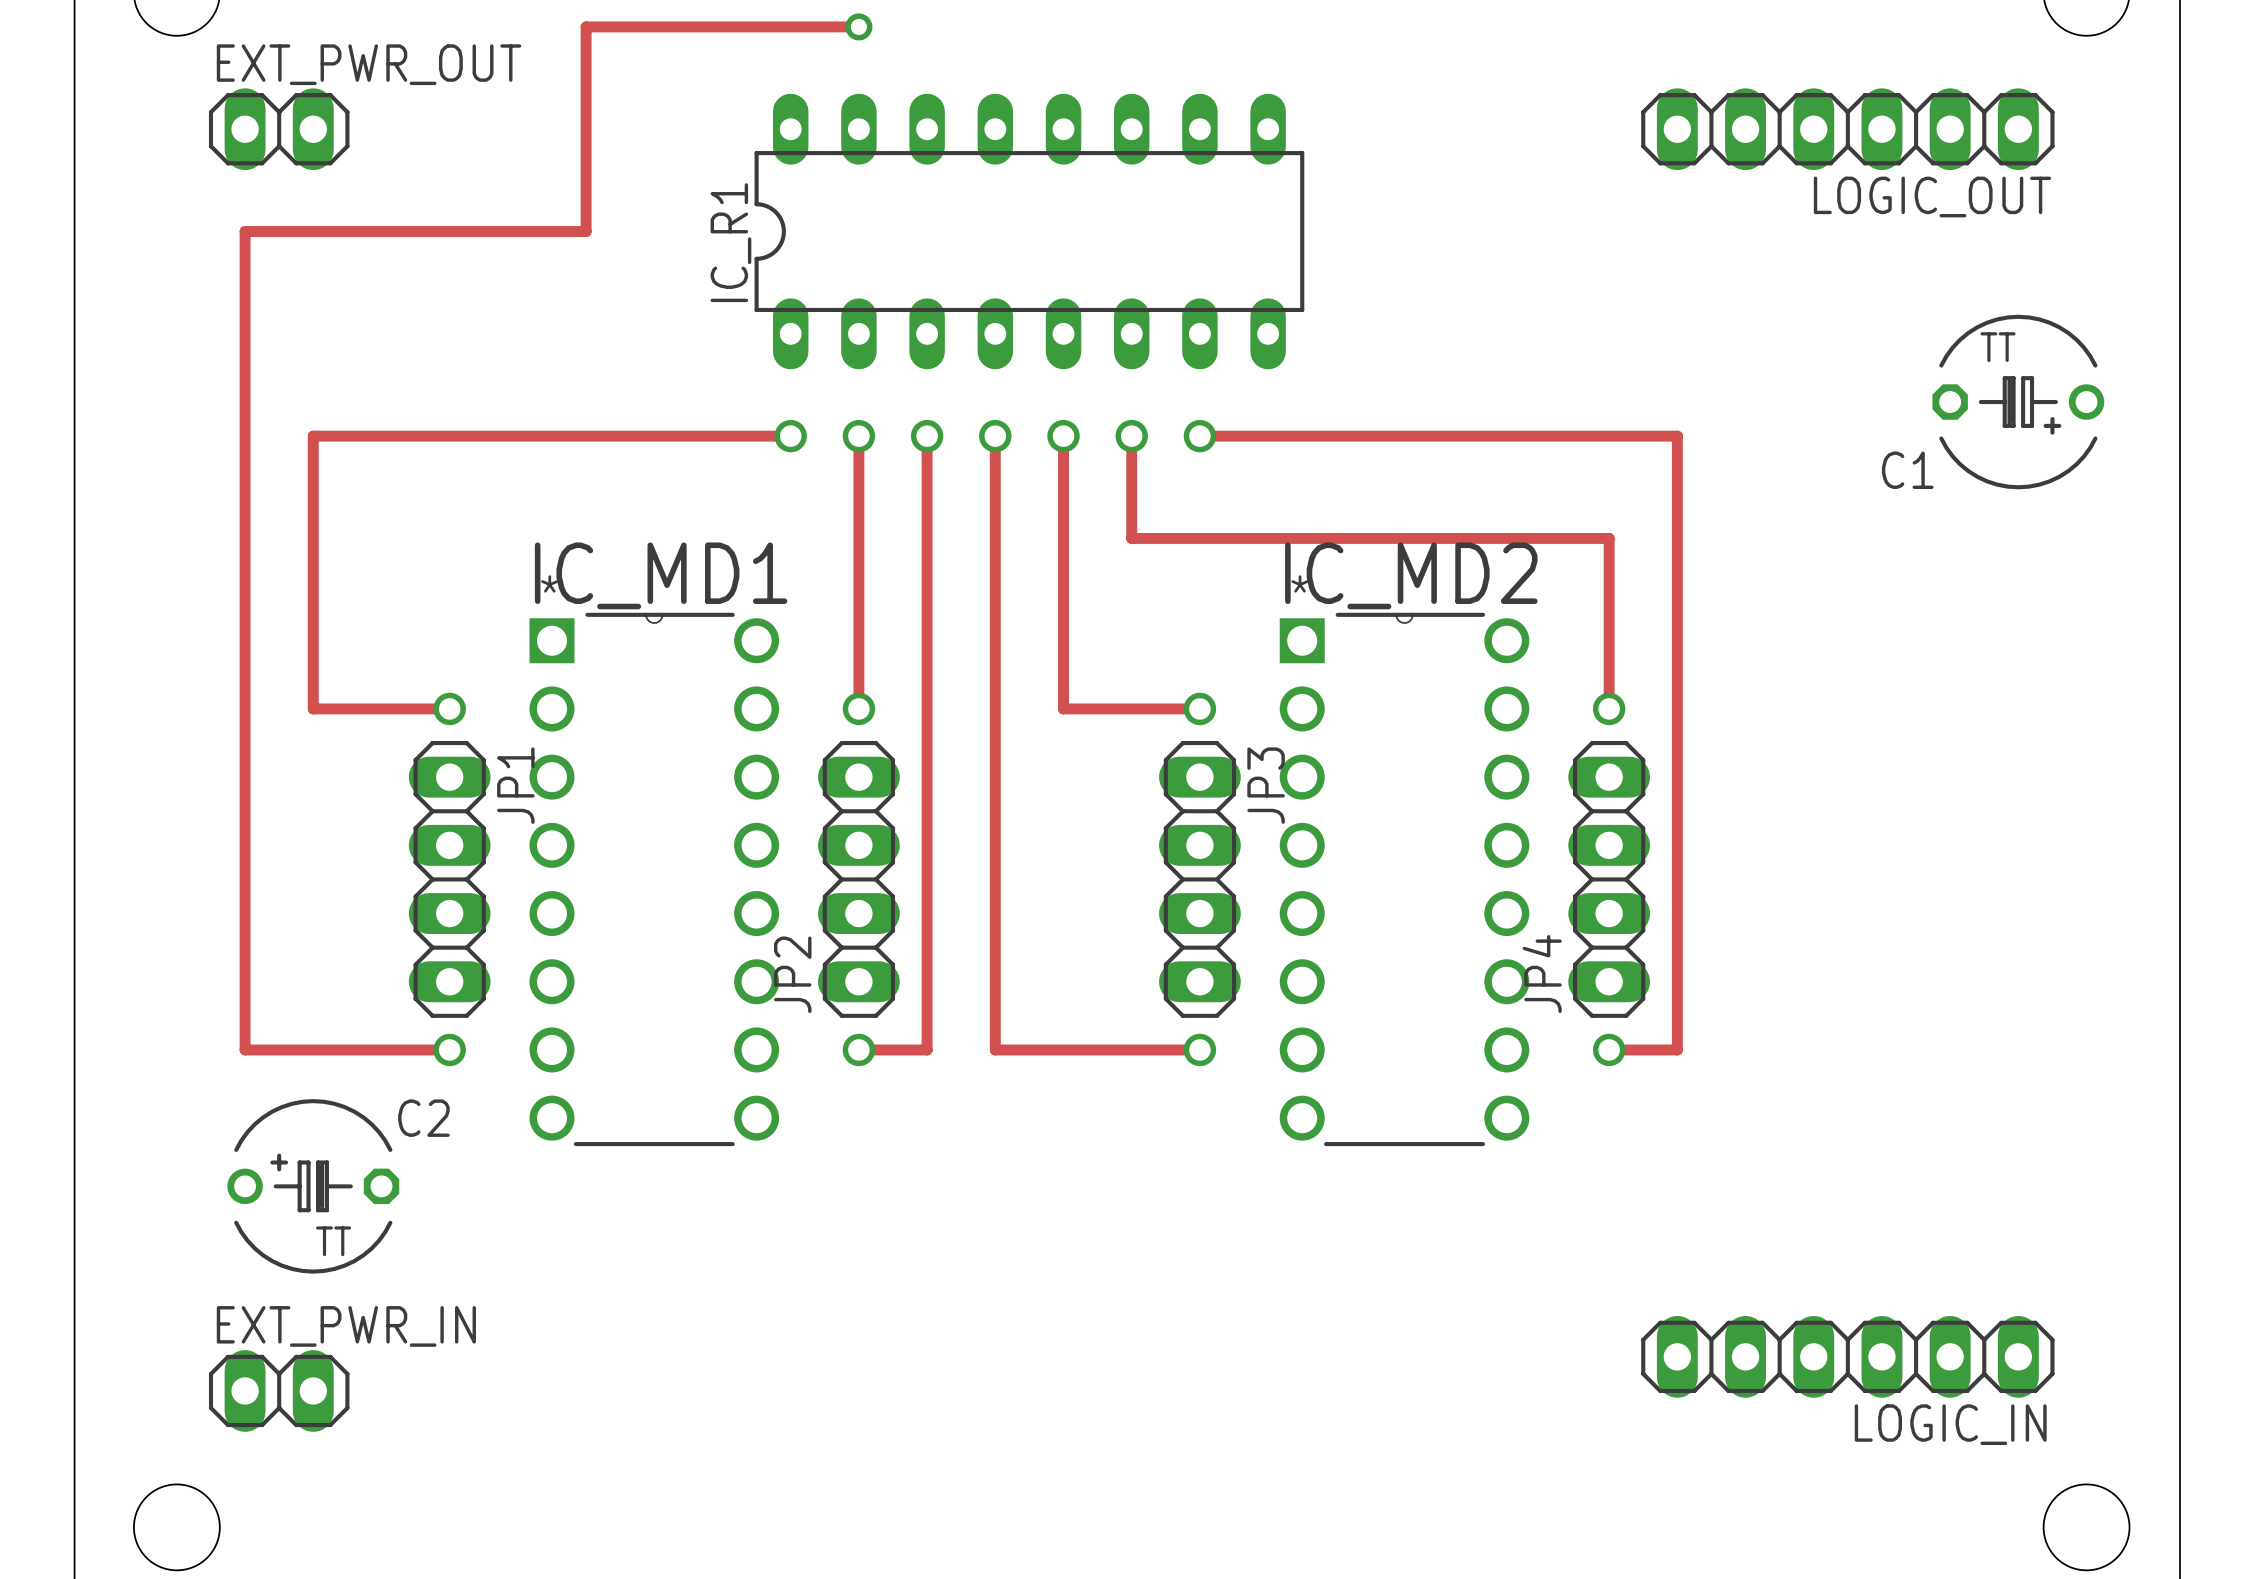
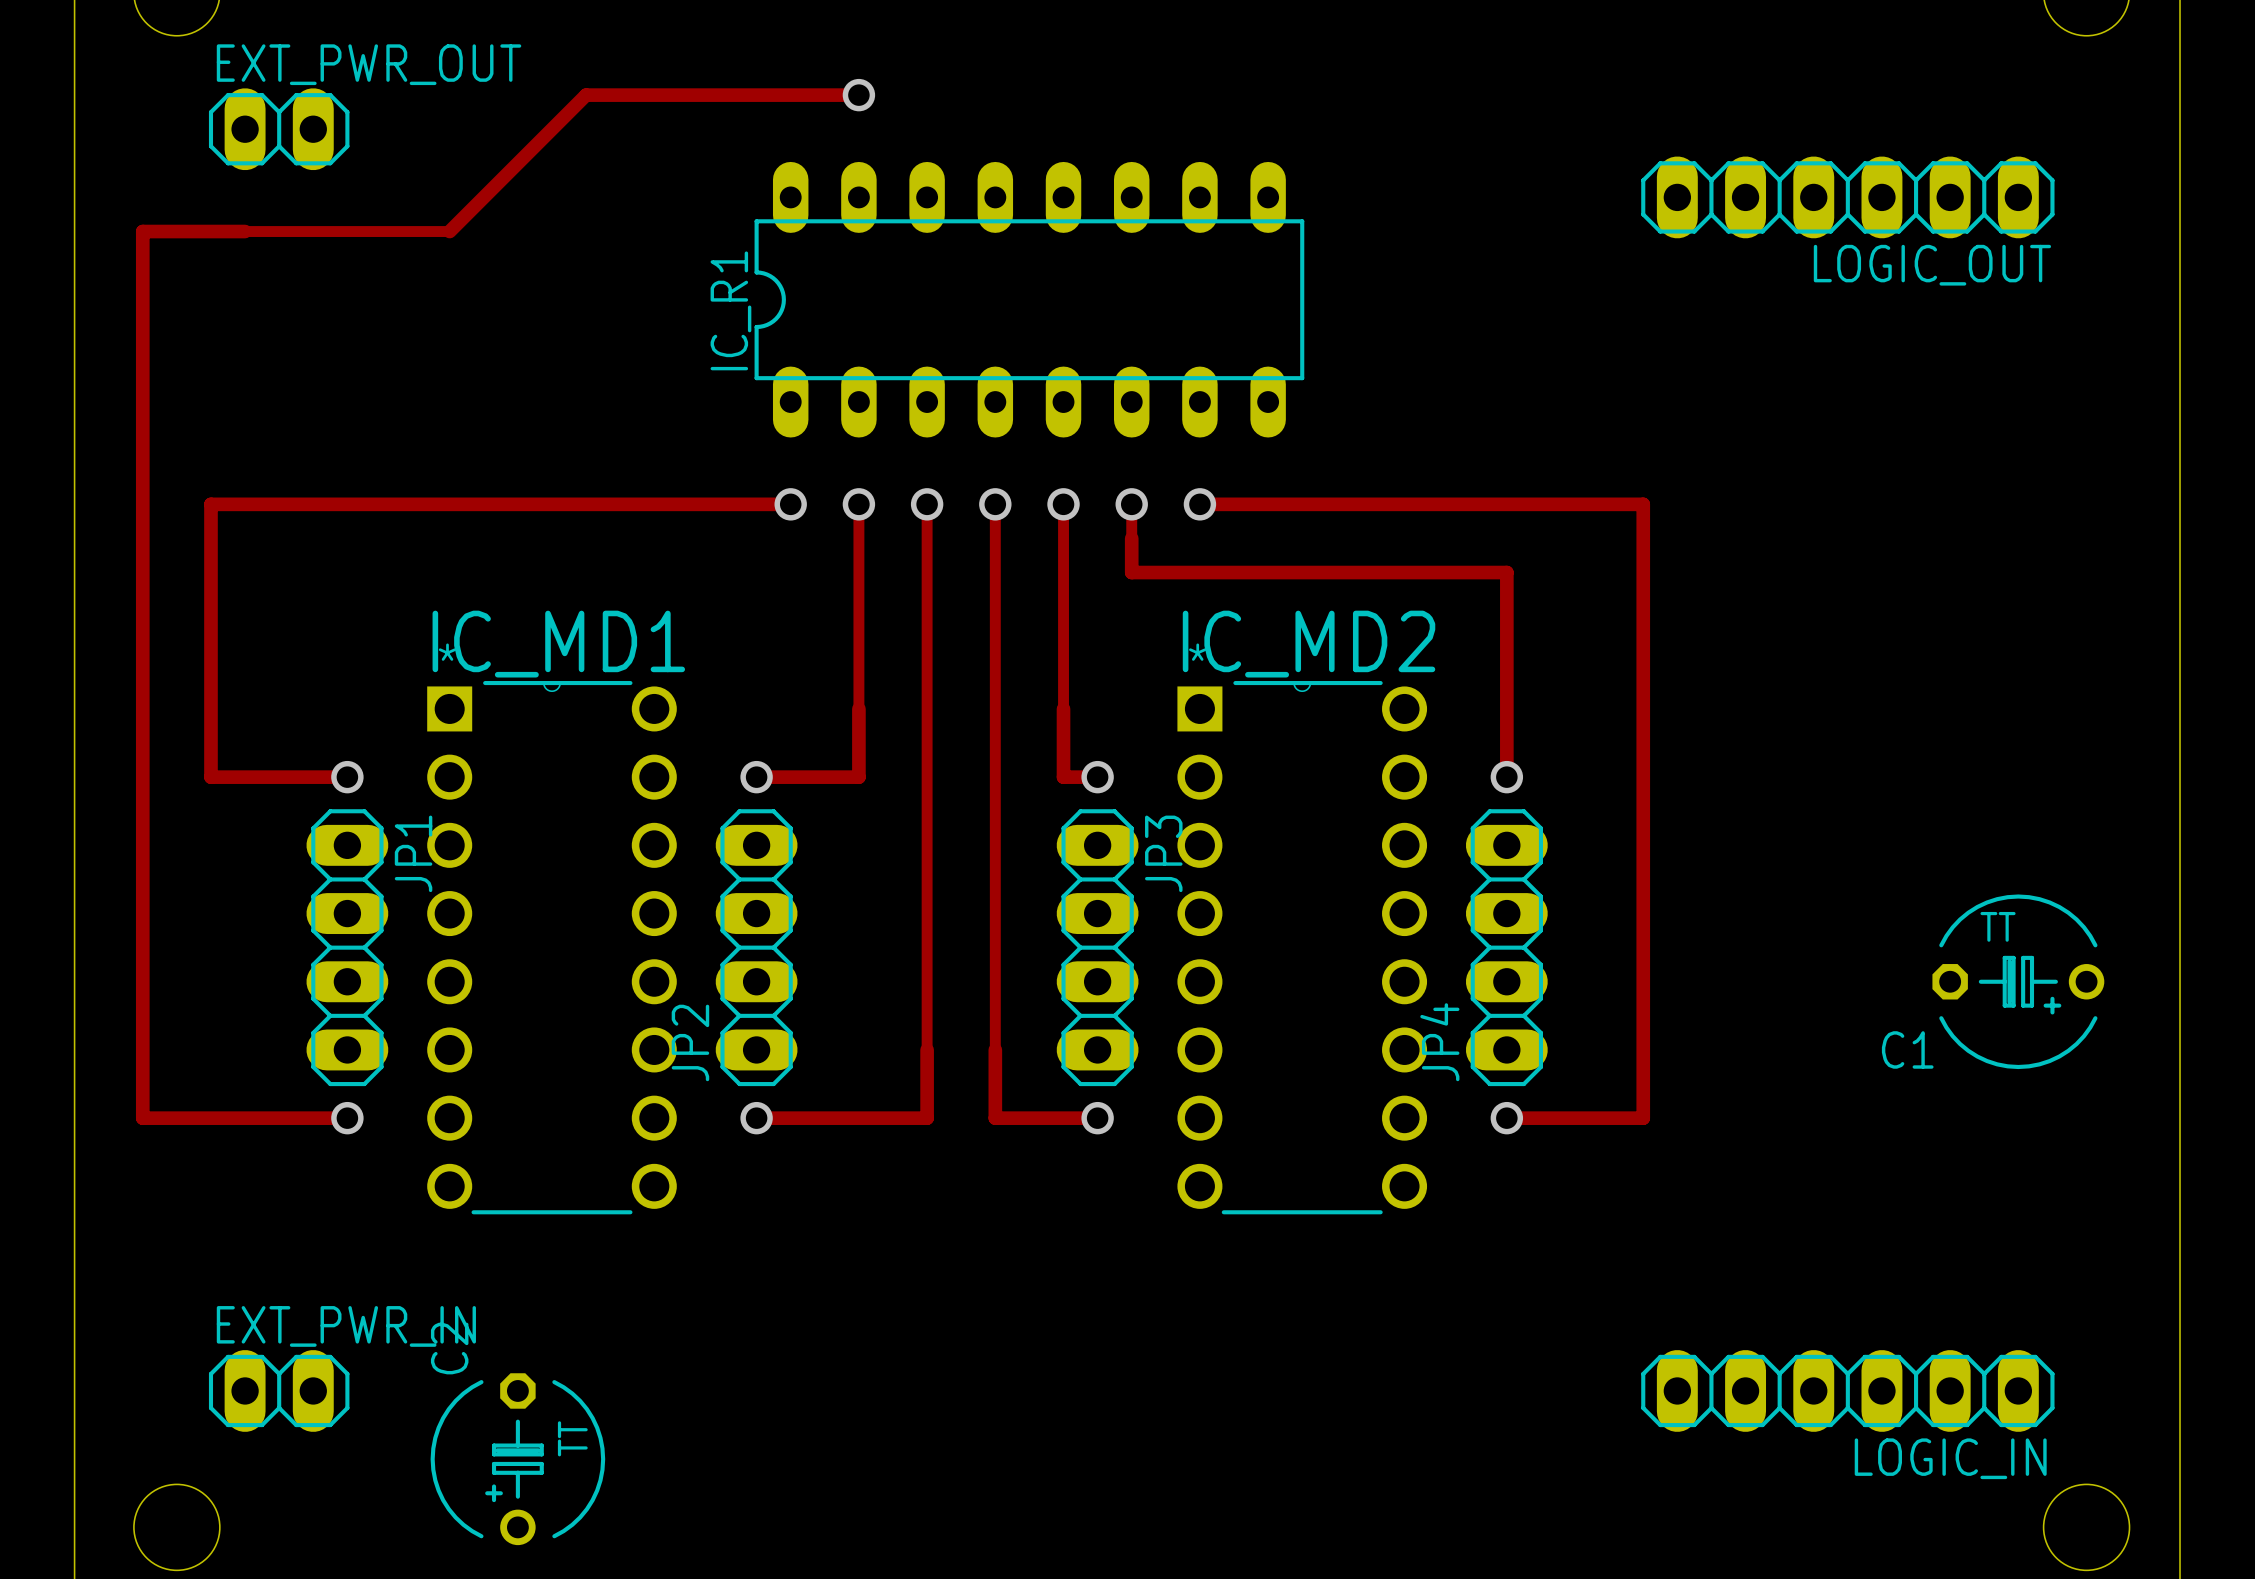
track: (858, 26) (586, 26) (586, 231) (449, 231) -> (858, 95) (586, 95) (449, 231)
via: (858, 26) -> none
via: none -> (858, 95)
LOGIC_OUT position: (1847, 129) -> (1847, 197)
track: (245, 231) (245, 1049) (449, 1049) -> (245, 231) (142, 231) (142, 1118) (347, 1118)
IC_R1 position: (1029, 231) -> (1029, 299)
C1 position: (2018, 402) -> (2018, 981)
track: (790, 436) (313, 436) (313, 708) (449, 708) -> none
via: (790, 436) -> none
track: (858, 436) (858, 504) -> none
via: (858, 436) -> none
track: (927, 436) (927, 504) -> none
via: (927, 436) -> none
track: (995, 436) (995, 504) -> none
via: (995, 436) -> none
track: (1063, 436) (1063, 504) -> none
via: (1063, 436) -> none
track: (1131, 436) (1131, 504) -> none
via: (1131, 436) -> none
track: (1199, 436) (1677, 436) (1677, 1049) (1609, 1049) -> none
via: (1199, 436) -> none
track: none -> (790, 504) (210, 504) (210, 777) (347, 777)
via: none -> (790, 504)
via: none -> (858, 504)
via: none -> (927, 504)
via: none -> (995, 504)
via: none -> (1063, 504)
via: none -> (1131, 504)
track: none -> (1199, 504) (1643, 504) (1643, 1118) (1506, 1118)
via: none -> (1199, 504)
track: (1131, 538) (1609, 538) (1609, 708) -> (1131, 538) (1131, 572) (1506, 572) (1506, 777)
via position: (449, 708) -> (347, 777)
track: none -> (858, 708) (858, 777) (756, 777)
via: (858, 708) -> none
track: (1063, 708) (1199, 708) -> (1063, 708) (1063, 777) (1097, 777)
via: (1199, 708) -> none
via position: (1609, 708) -> (1506, 777)
via: none -> (756, 777)
via: none -> (1097, 777)
JP1 position: (449, 879) -> (347, 947)
IC_MD1 position: (654, 879) -> (552, 947)
JP2 position: (858, 879) -> (756, 947)
JP3 position: (1199, 879) -> (1097, 947)
IC_MD2 position: (1404, 879) -> (1302, 947)
JP4 position: (1609, 879) -> (1506, 947)
via position: (449, 1049) -> (347, 1118)
track: (858, 1049) (927, 1049) -> (756, 1118) (927, 1118) (927, 1049)
via position: (858, 1049) -> (756, 1118)
track: (995, 1049) (1199, 1049) -> (995, 1049) (995, 1118) (1097, 1118)
via position: (1199, 1049) -> (1097, 1118)
via position: (1609, 1049) -> (1506, 1118)
C2 rotation: 0° (313, 1186) -> 90° counterclockwise (517, 1459)
C2 position: (313, 1186) -> (517, 1459)
LOGIC_IN position: (1847, 1356) -> (1847, 1390)

